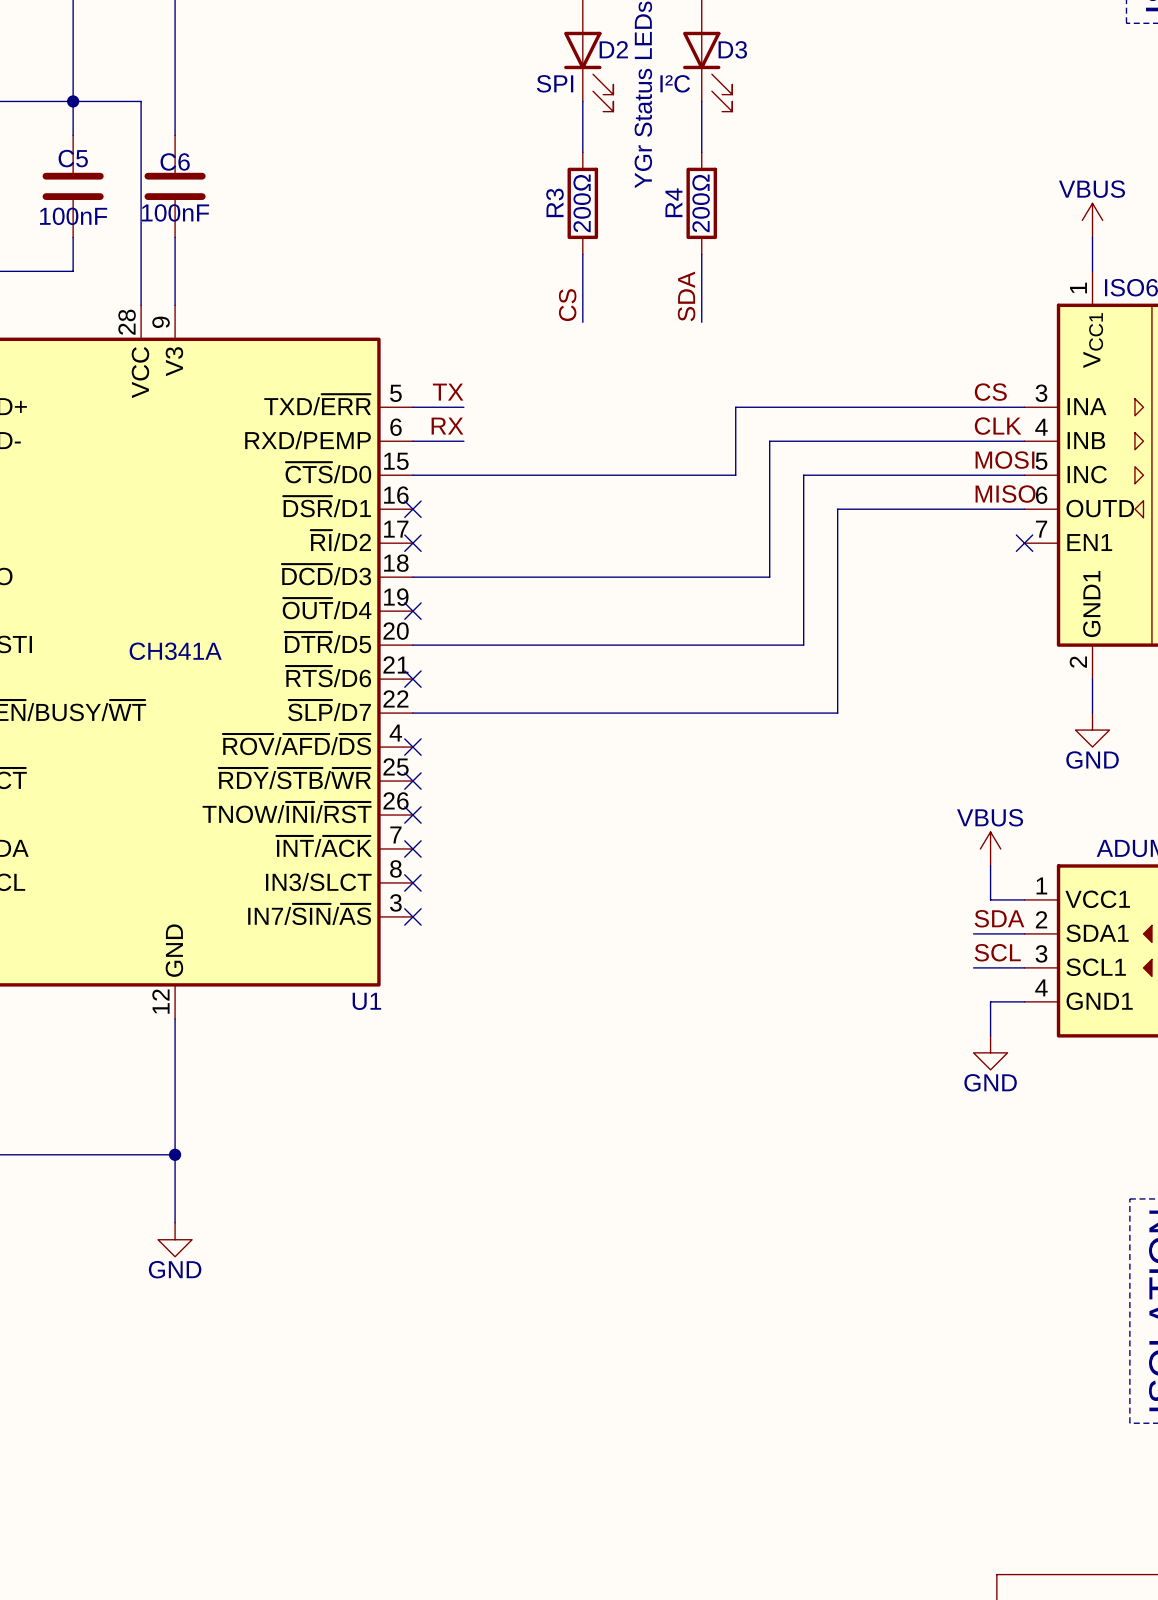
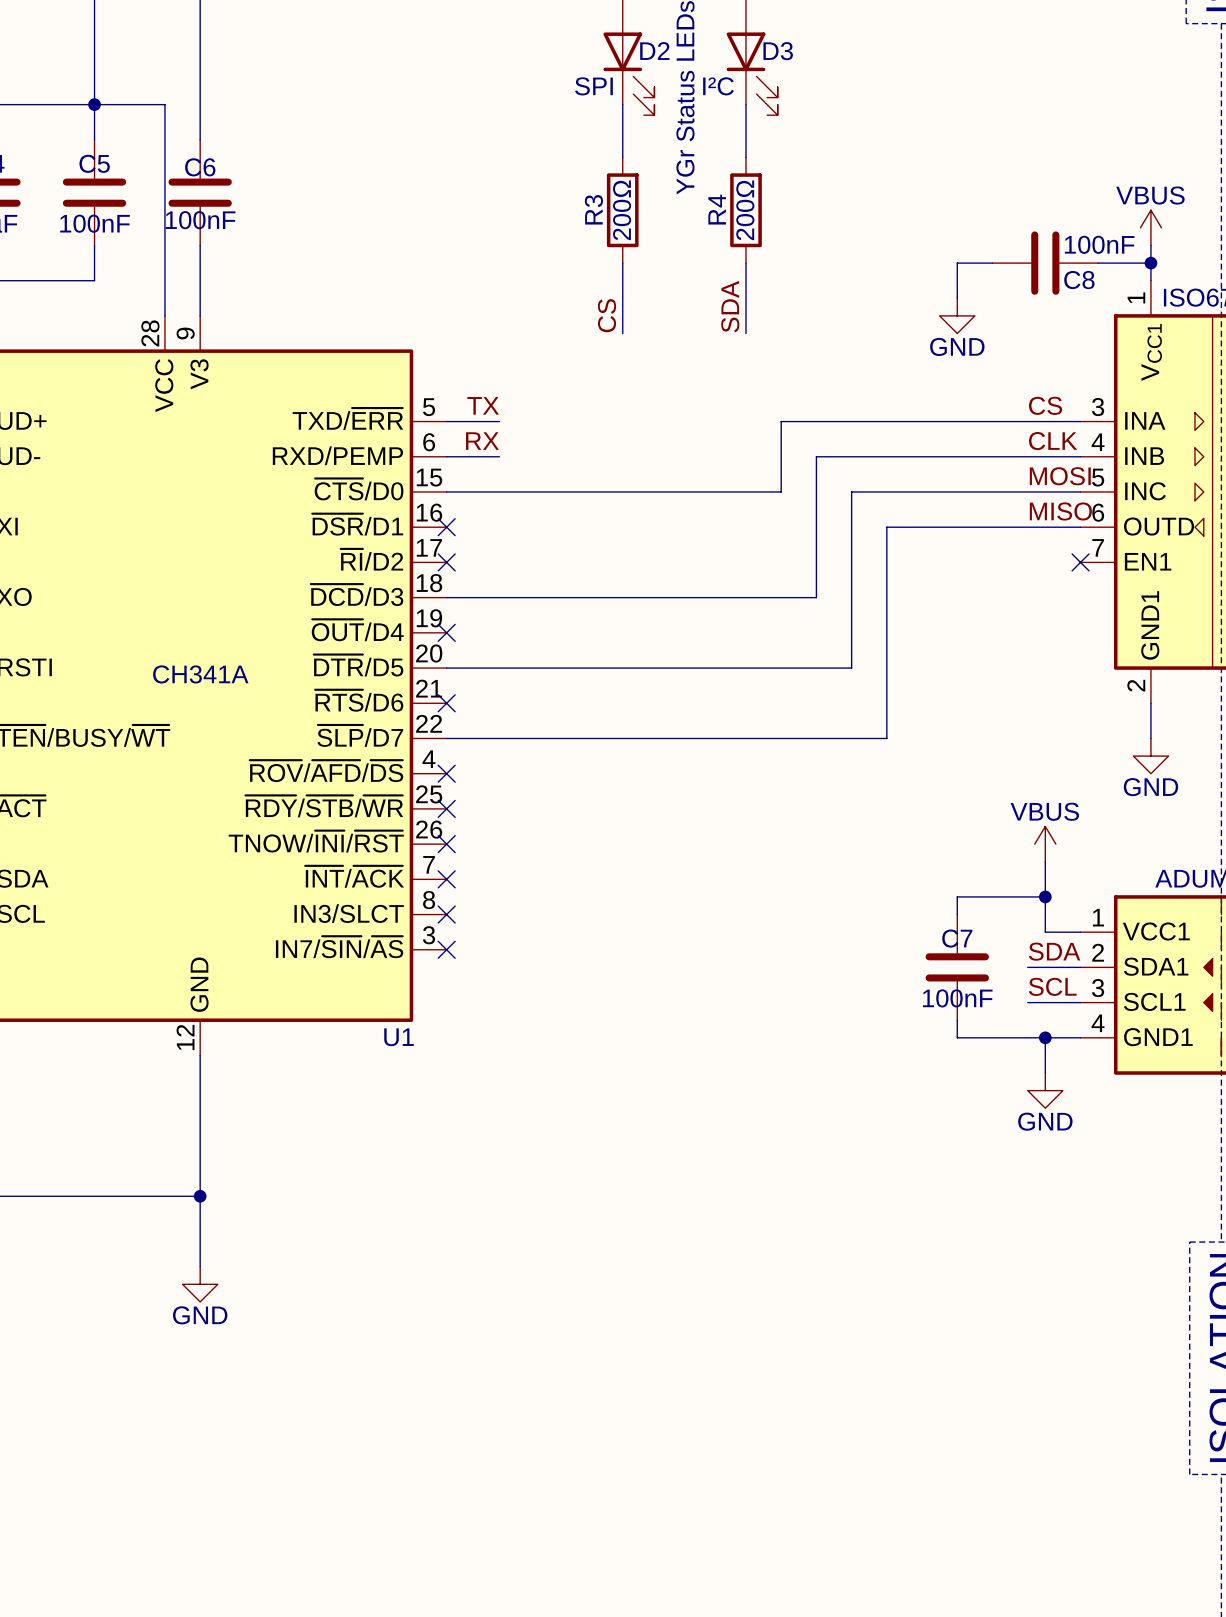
wire: none -> (992, 263) (957, 263) (957, 298)
C8: none -> 100nF (1045, 263)
wire: none -> (1098, 263) (1150, 263)
junction: none -> (1150, 263)
power symbol: none -> GND (957, 315)
wire: none -> (1045, 861) (1045, 896) (957, 896) (957, 914)
power symbol position: VBUS (990, 848) -> VBUS (1045, 844)
junction: none -> (1045, 896)
C7: none -> 100nF (957, 967)
wire: none -> (957, 1020) (957, 1037) (1045, 1037)
junction: none -> (1045, 1037)

